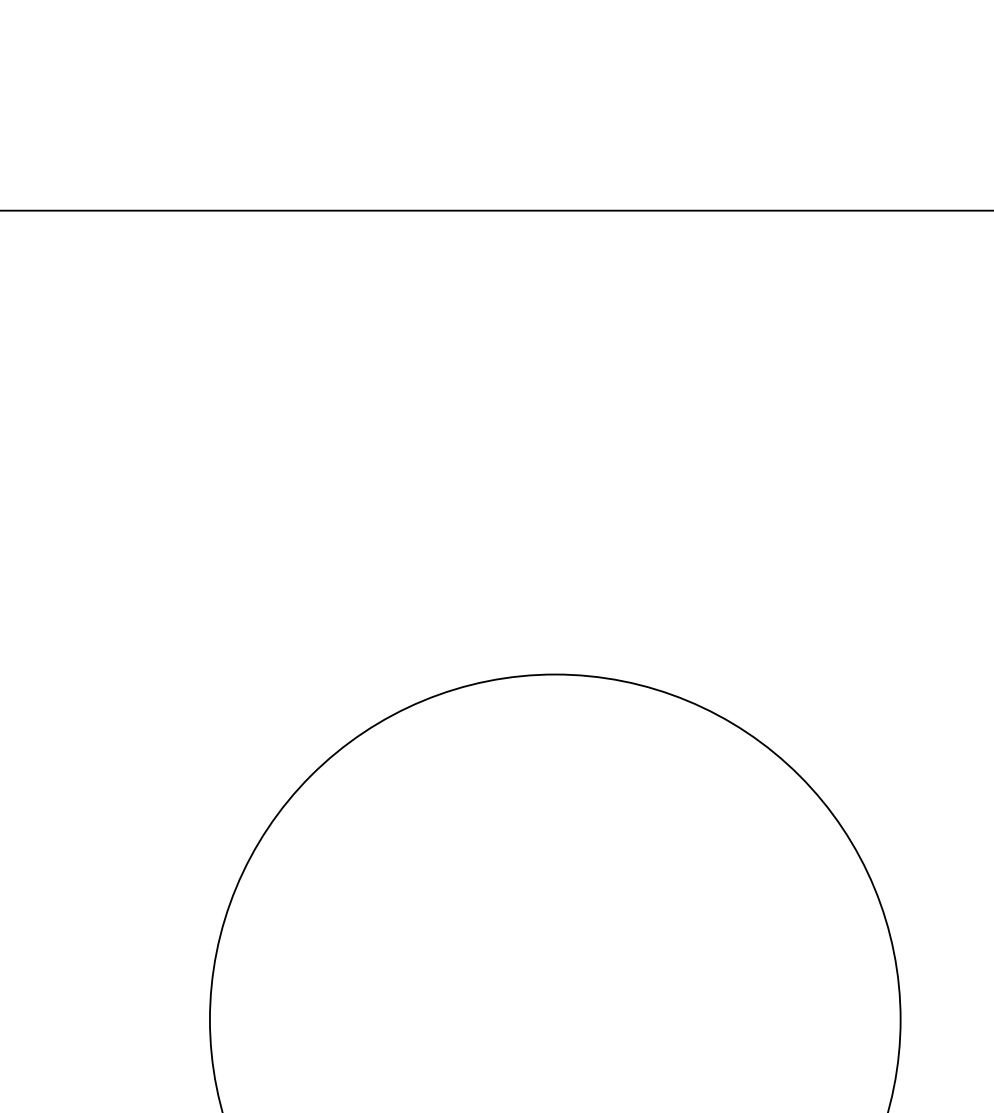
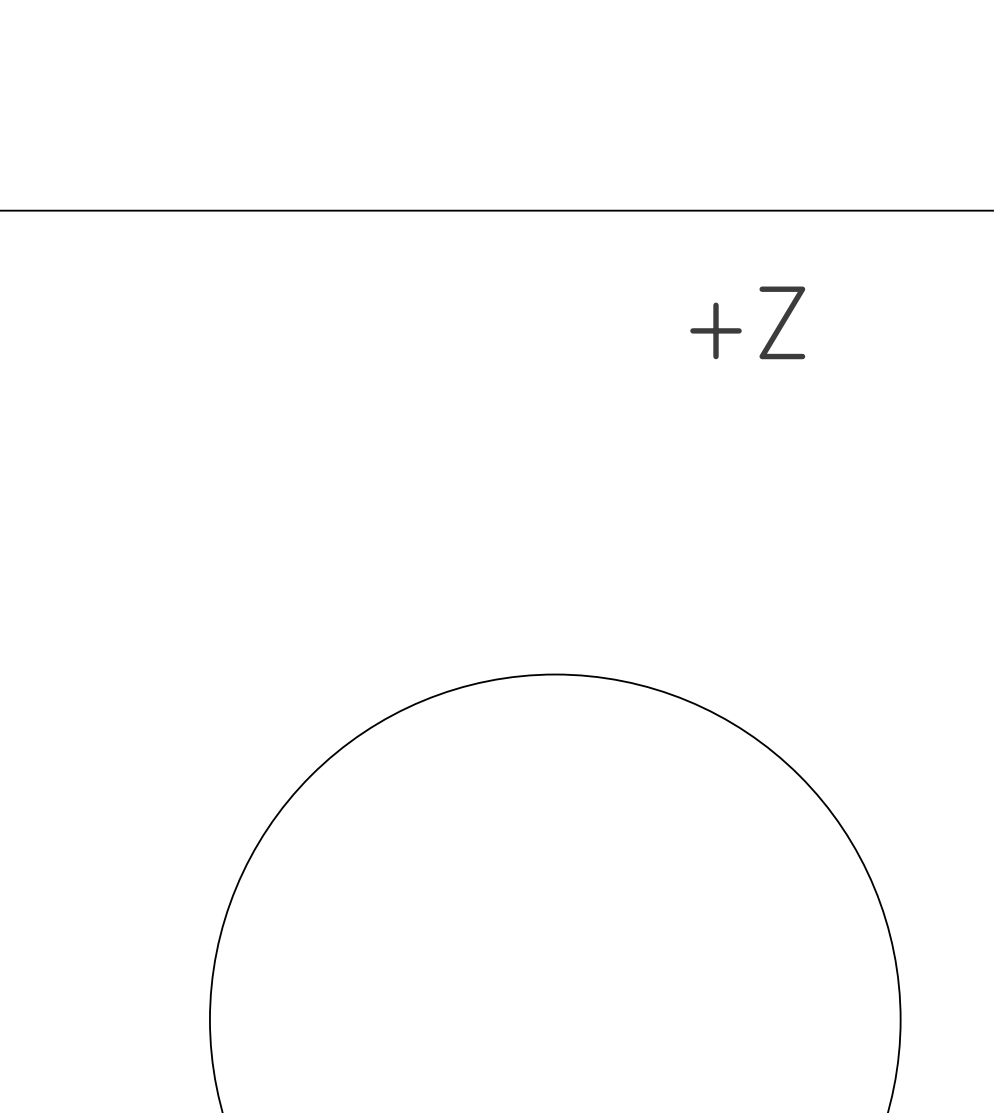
text: none -> +Z (747, 322)

